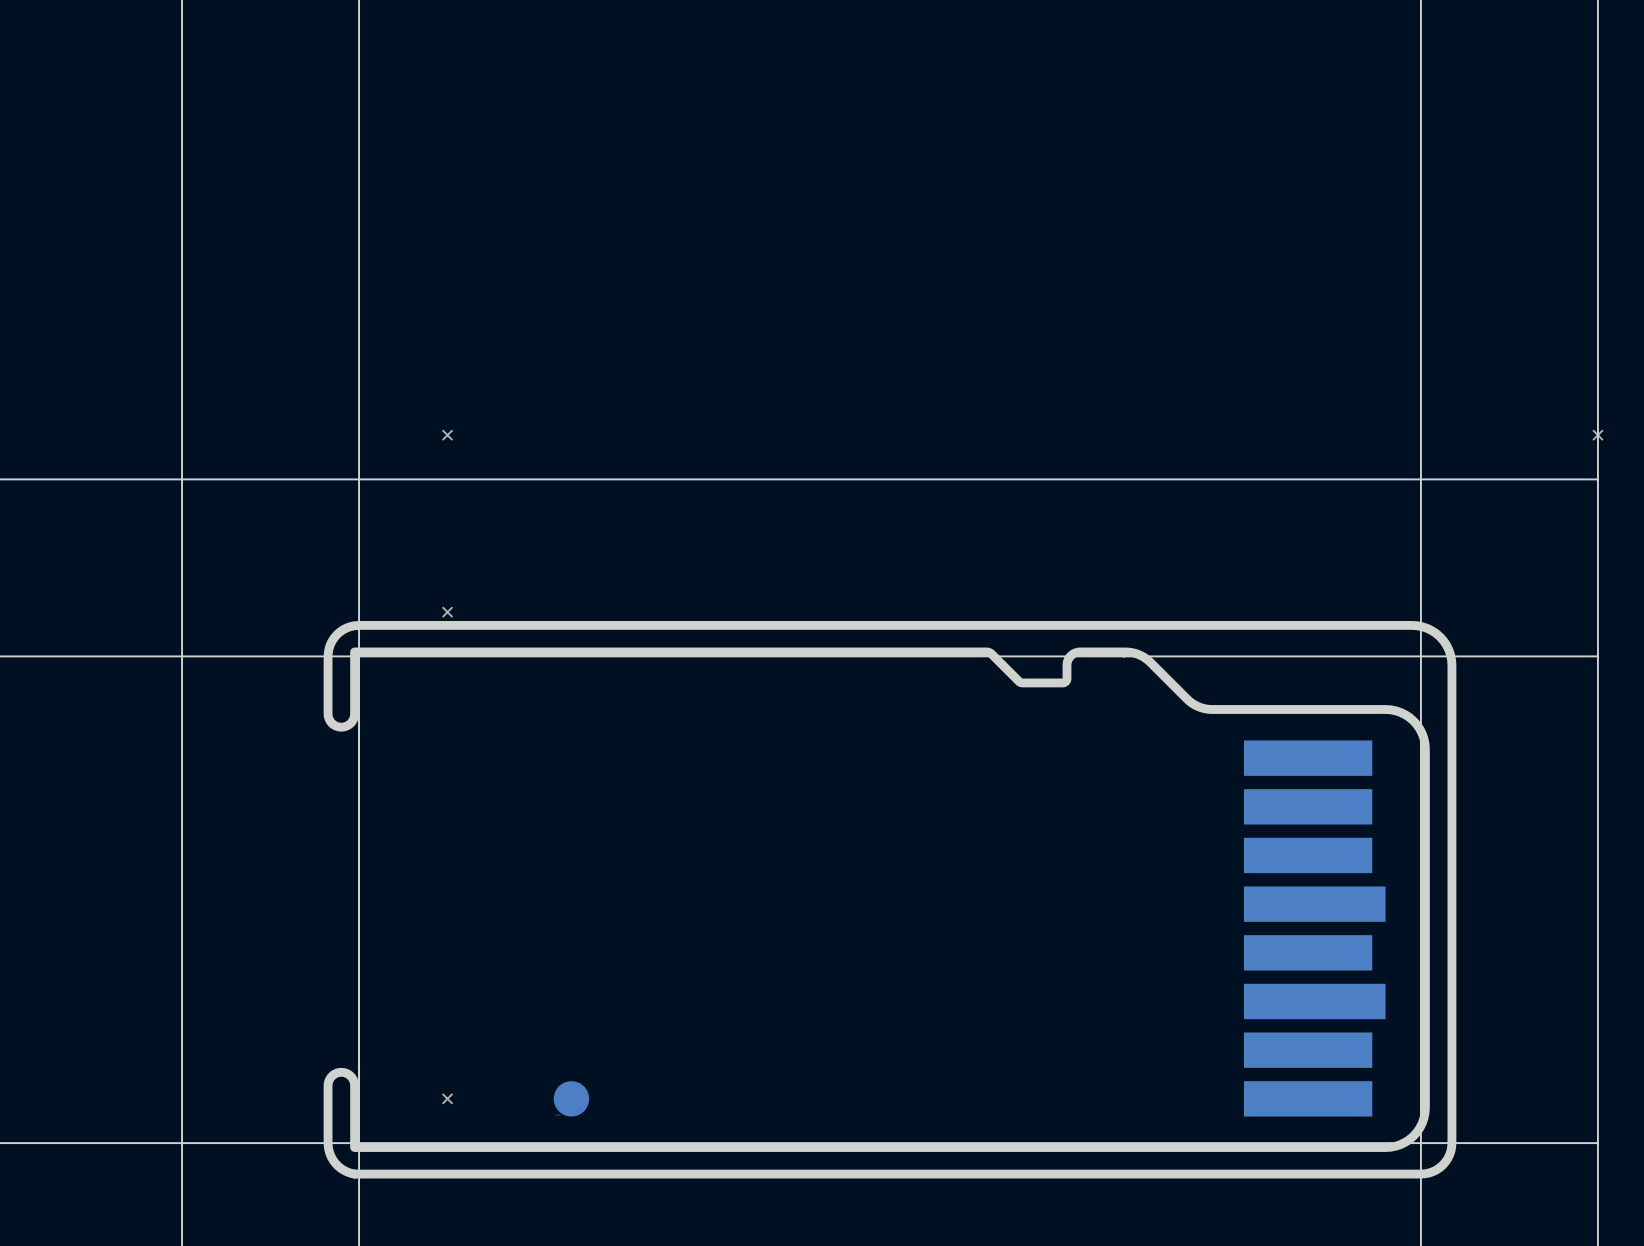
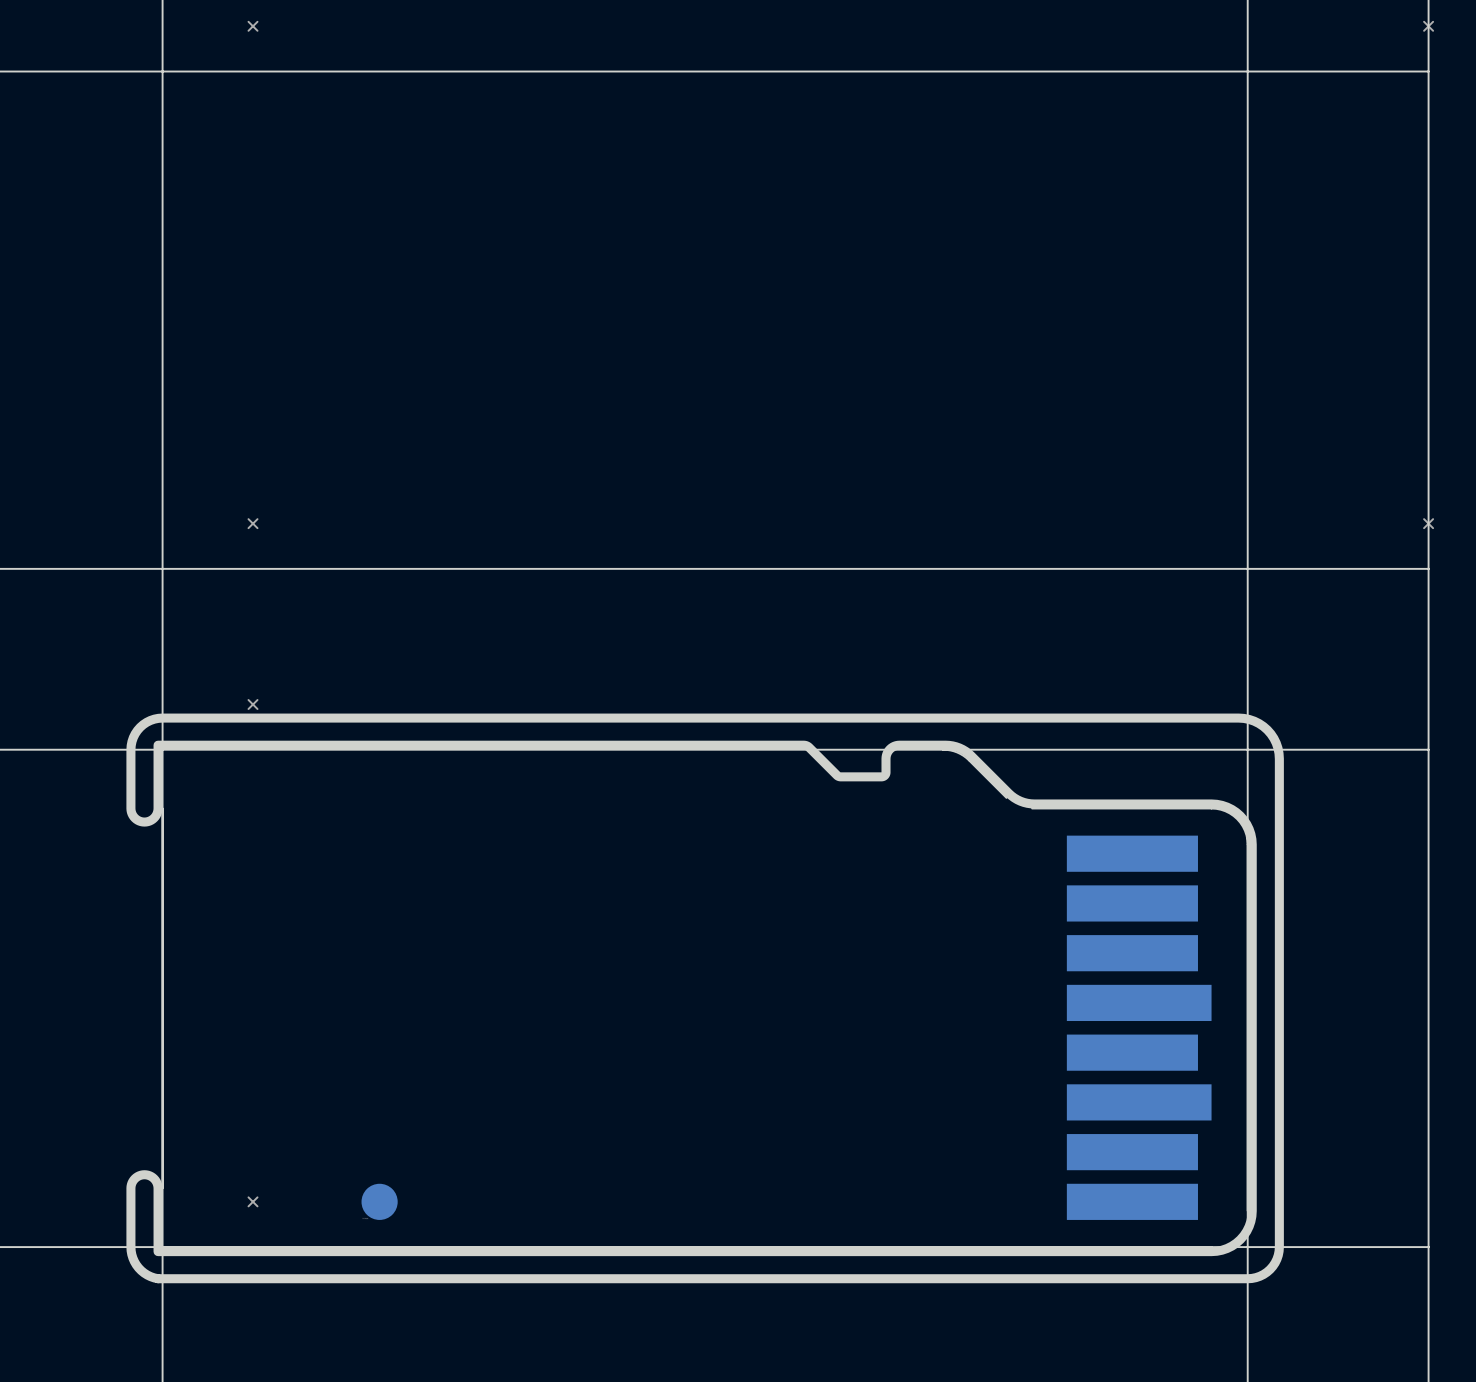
part footprint: [323, 620, 1457, 1179] -> [126, 713, 1284, 1284]

